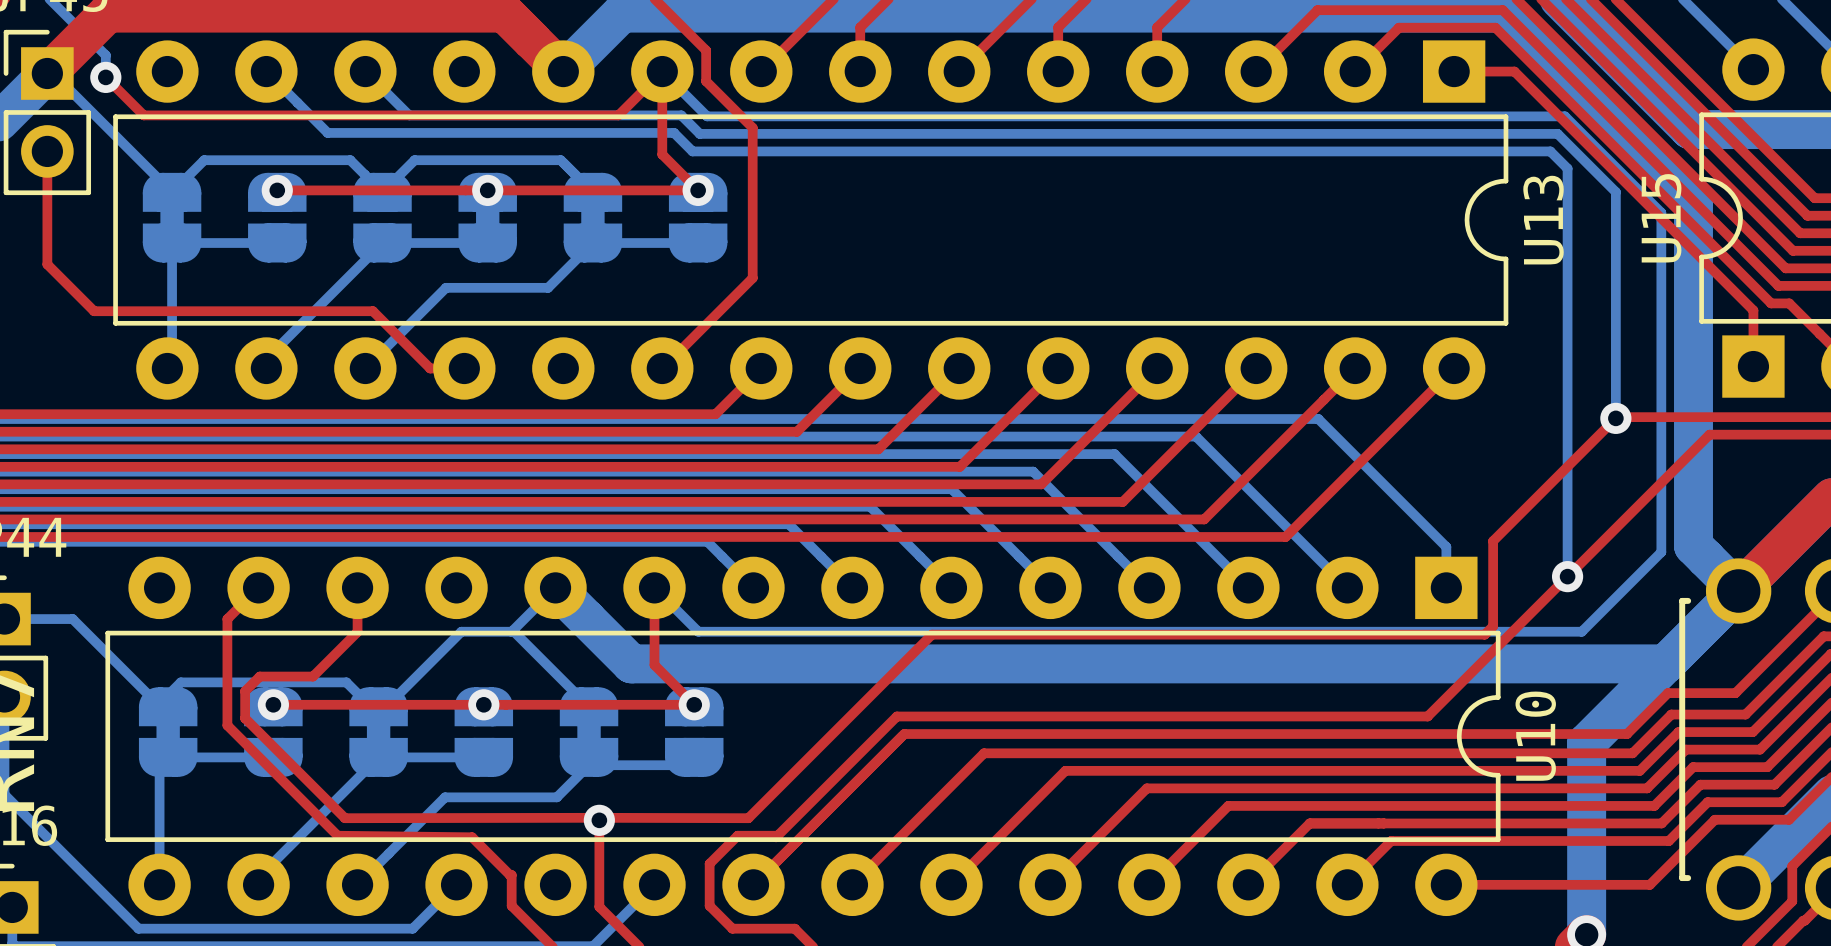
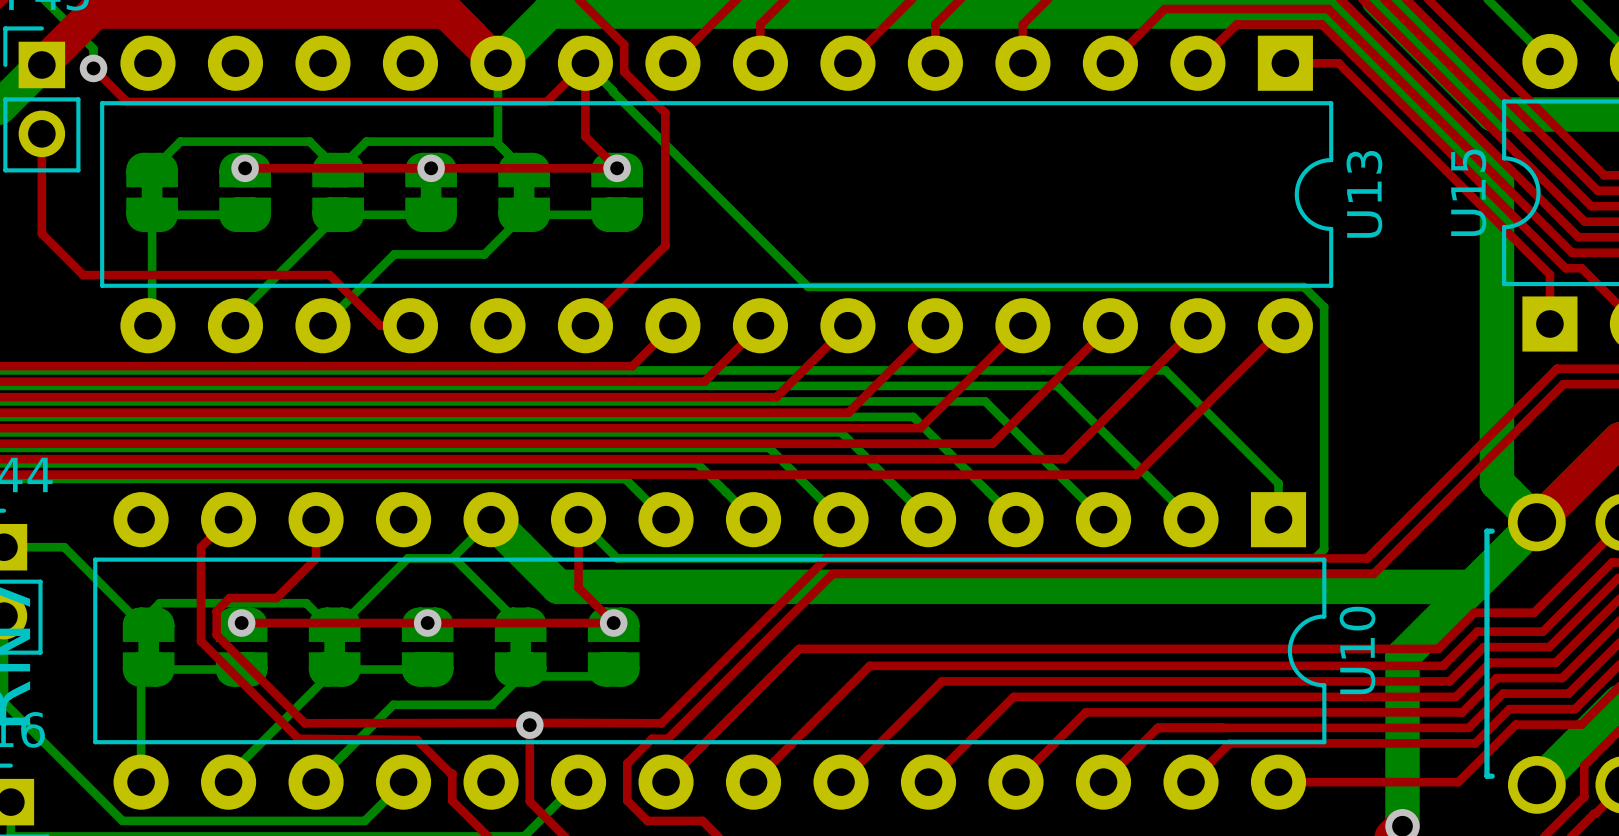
bottom track: (266, 71) (327, 132) (674, 132) (692, 151) (1550, 151) (1567, 168) (1567, 576) -> none
bottom track: (365, 71) (409, 115) (681, 115) (699, 133) (1557, 133) (1615, 192) (1615, 418) -> none
bottom track: none -> (497, 63) (497, 143)
bottom track: (47, 73) (53, 73) (172, 192) -> none
bottom track: (693, 102) (707, 116) (1564, 116) (1661, 212) (1661, 552) (1581, 631) (1487, 631) -> (612, 90) (808, 286) (1303, 286) (1324, 307) (1324, 549) (1315, 558)
top track: (1761, 417) (1617, 417) (1493, 541) (1493, 626) (1484, 634) (931, 634) -> (1556, 368) (1367, 558) (826, 558) (823, 561)
via: (1615, 418) -> none
top track: (1768, 434) (1709, 434) (1427, 716) (896, 716) (776, 837) (777, 835) (755, 835) -> (1563, 384) (1373, 573) (832, 573) (667, 738)
via: (1567, 576) -> none

